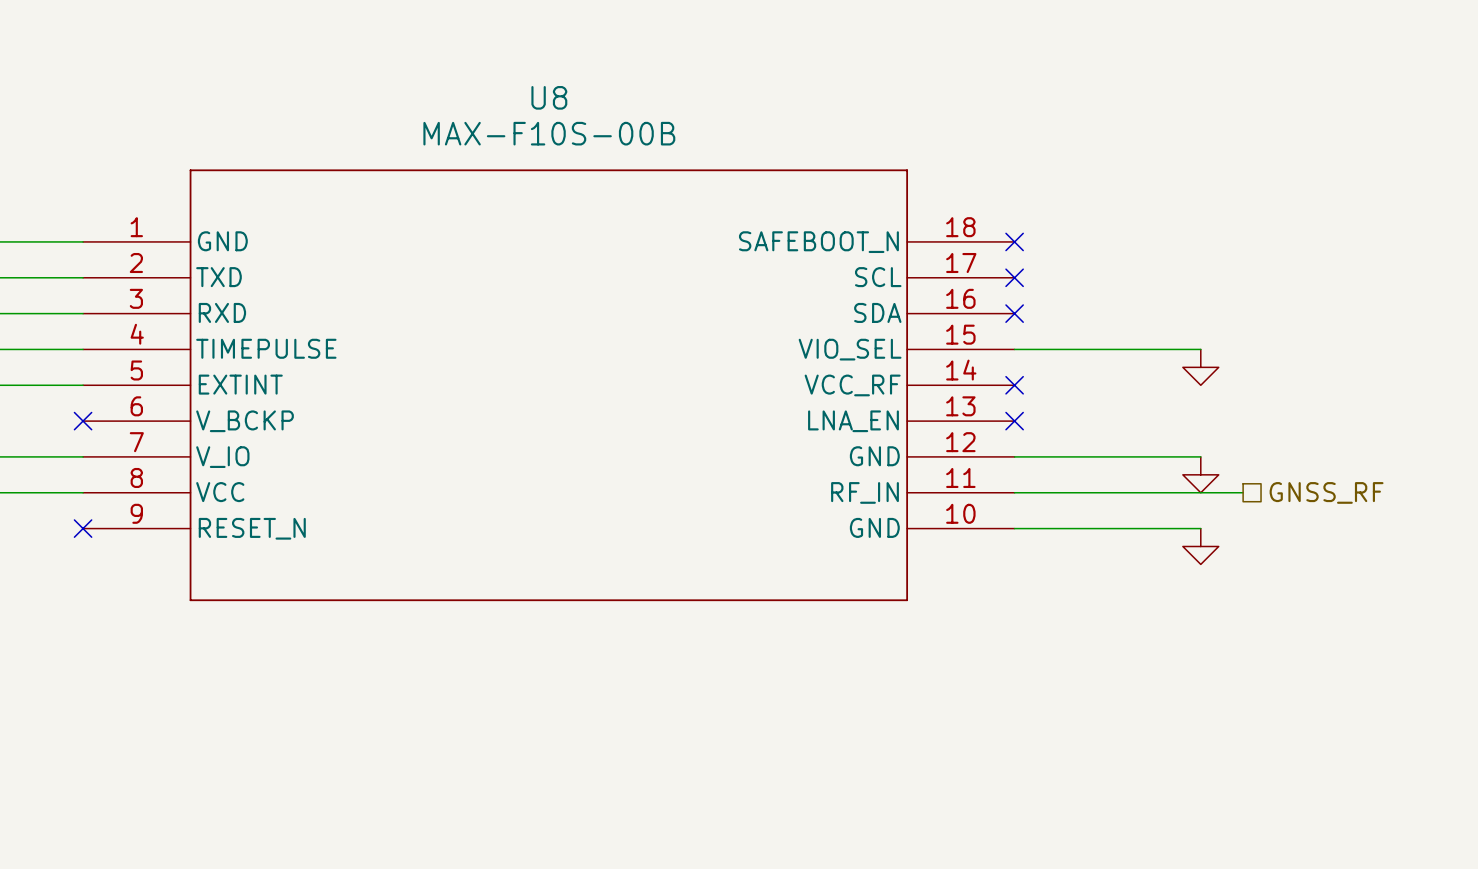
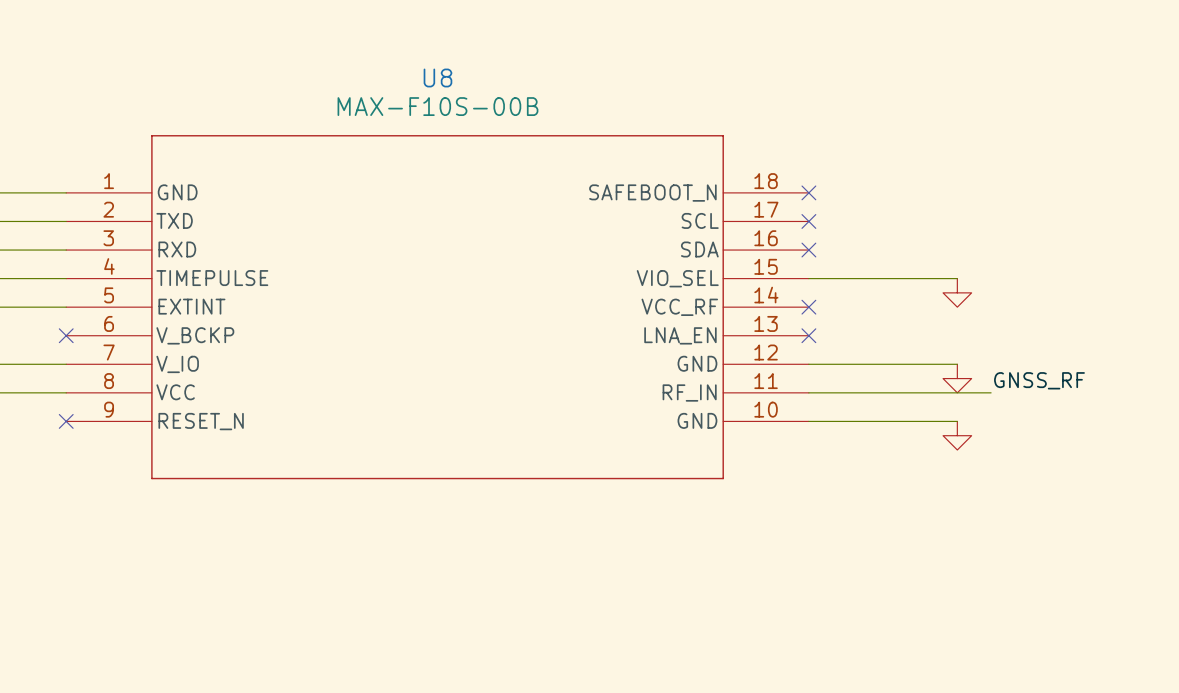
label: none -> GNSS_RF (1039, 380)
hierarchical label: GNSS_RF (1326, 492) -> none

